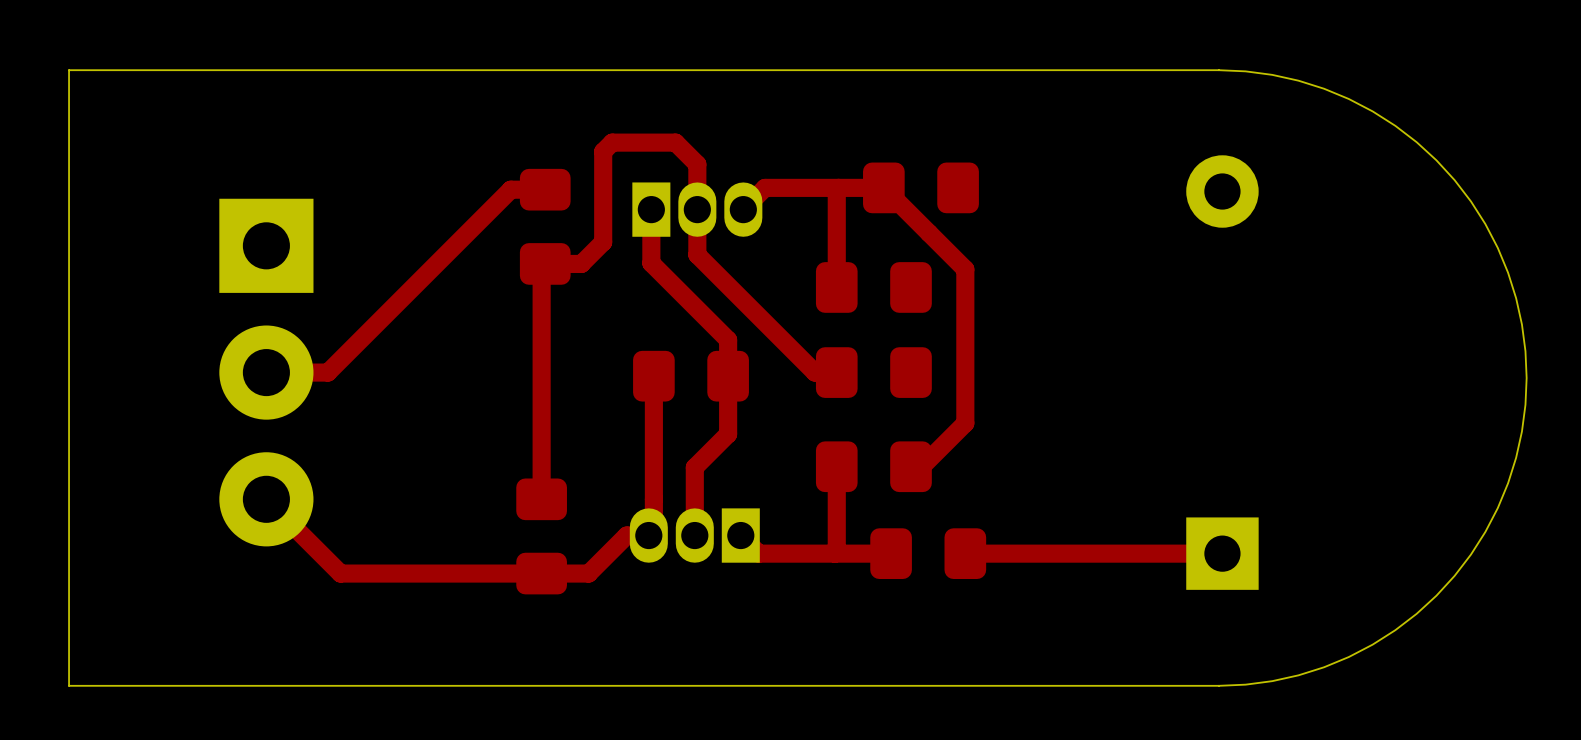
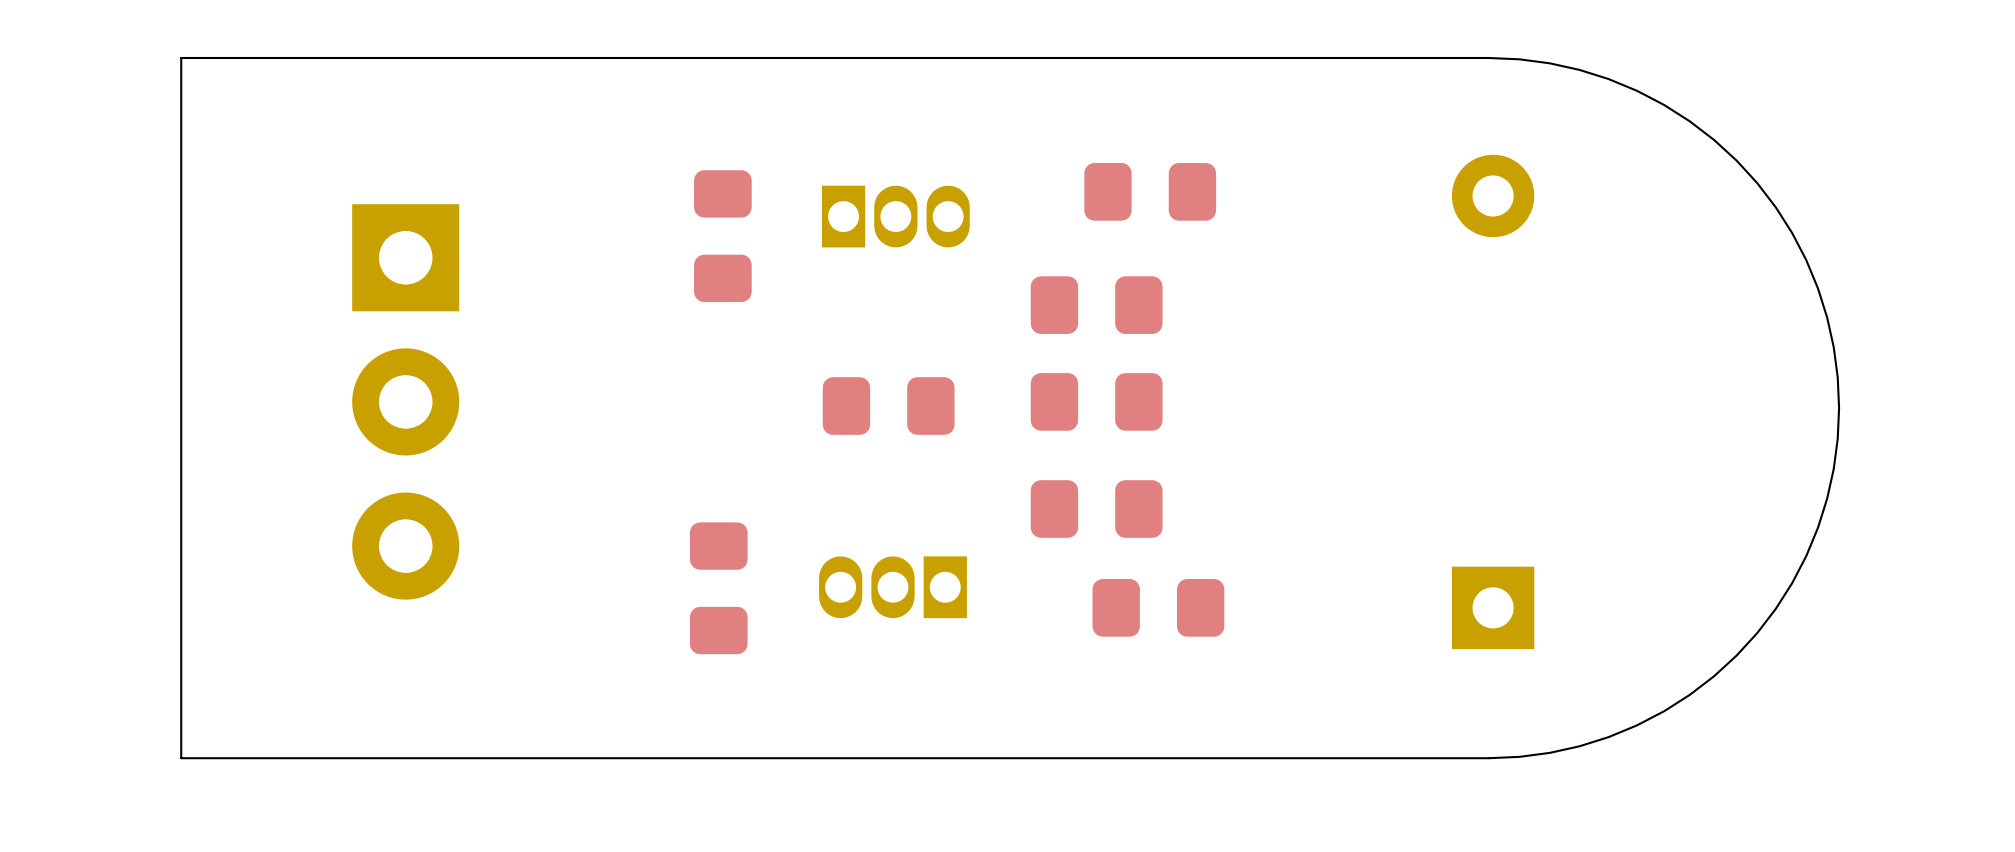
top track: (838, 187) (836, 189) (836, 287) -> none
top track: (545, 189) (510, 189) (327, 372) (266, 372) -> none
top track: (651, 209) (651, 263) (728, 339) (728, 434) (694, 467) (694, 535) -> none
top track: (743, 209) (765, 187) (883, 187) (965, 269) (965, 423) (921, 466) (911, 466) -> none
top track: (836, 372) (815, 372) (697, 254) (697, 164) (675, 142) (612, 142) (603, 151) (603, 242) (581, 263) (545, 263) (541, 267) (541, 499) -> none
top track: (653, 376) (653, 530) (648, 535) (626, 535) (588, 573) (340, 573) (266, 499) -> none
top track: (836, 466) (836, 551) (834, 553) -> none
top track: (740, 535) (758, 553) (891, 553) -> none
top track: (1222, 553) (965, 553) -> none

